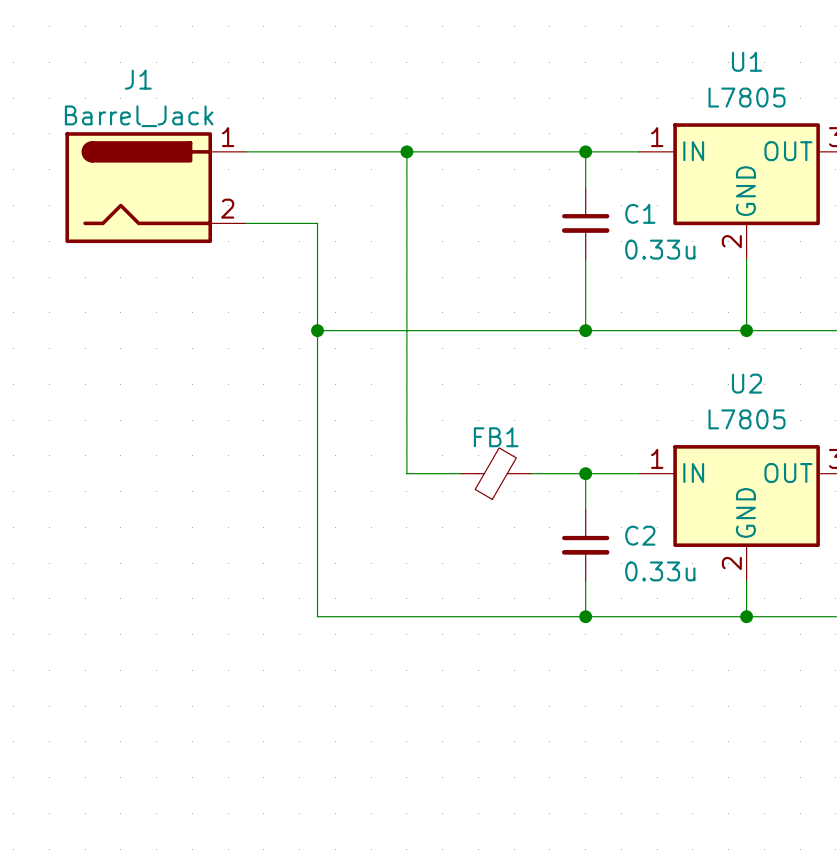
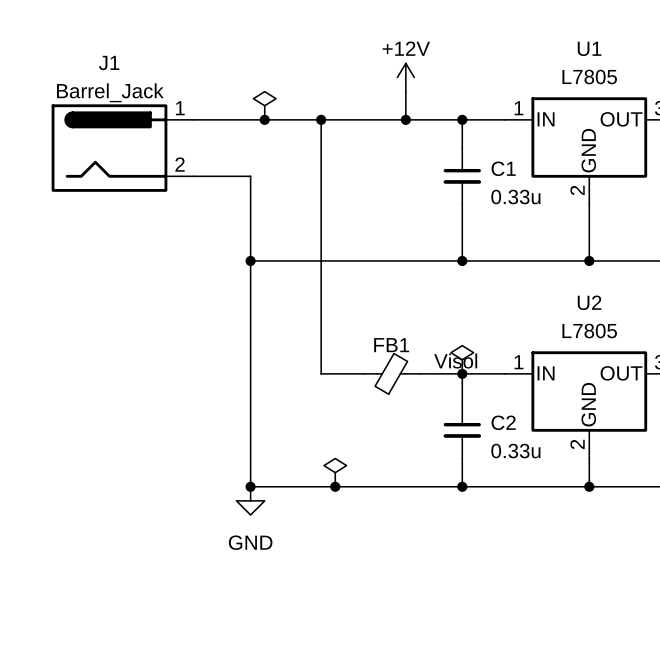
power symbol: none -> +12V (405, 77)
wire: none -> (405, 91) (405, 119)
power symbol: none -> (264, 105)
junction: none -> (264, 119)
junction: none -> (405, 119)
power symbol: none -> (462, 359)
label: none -> Visol (455, 361)
power symbol: none -> (335, 472)
junction: none -> (250, 486)
junction: none -> (335, 486)
power symbol: none -> GND (250, 500)

